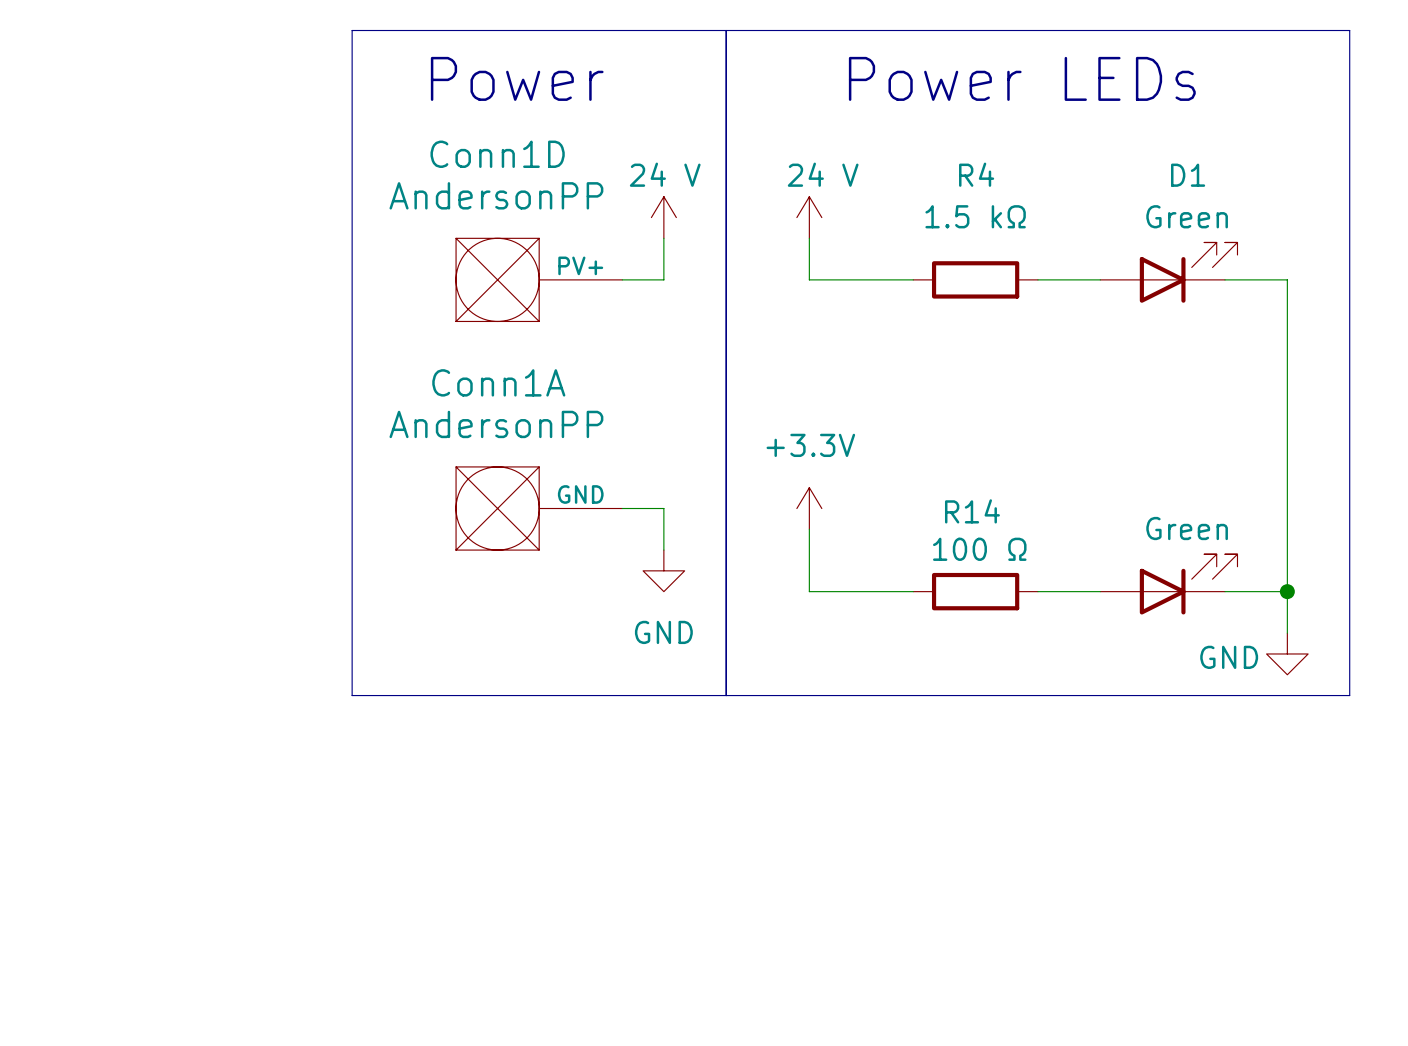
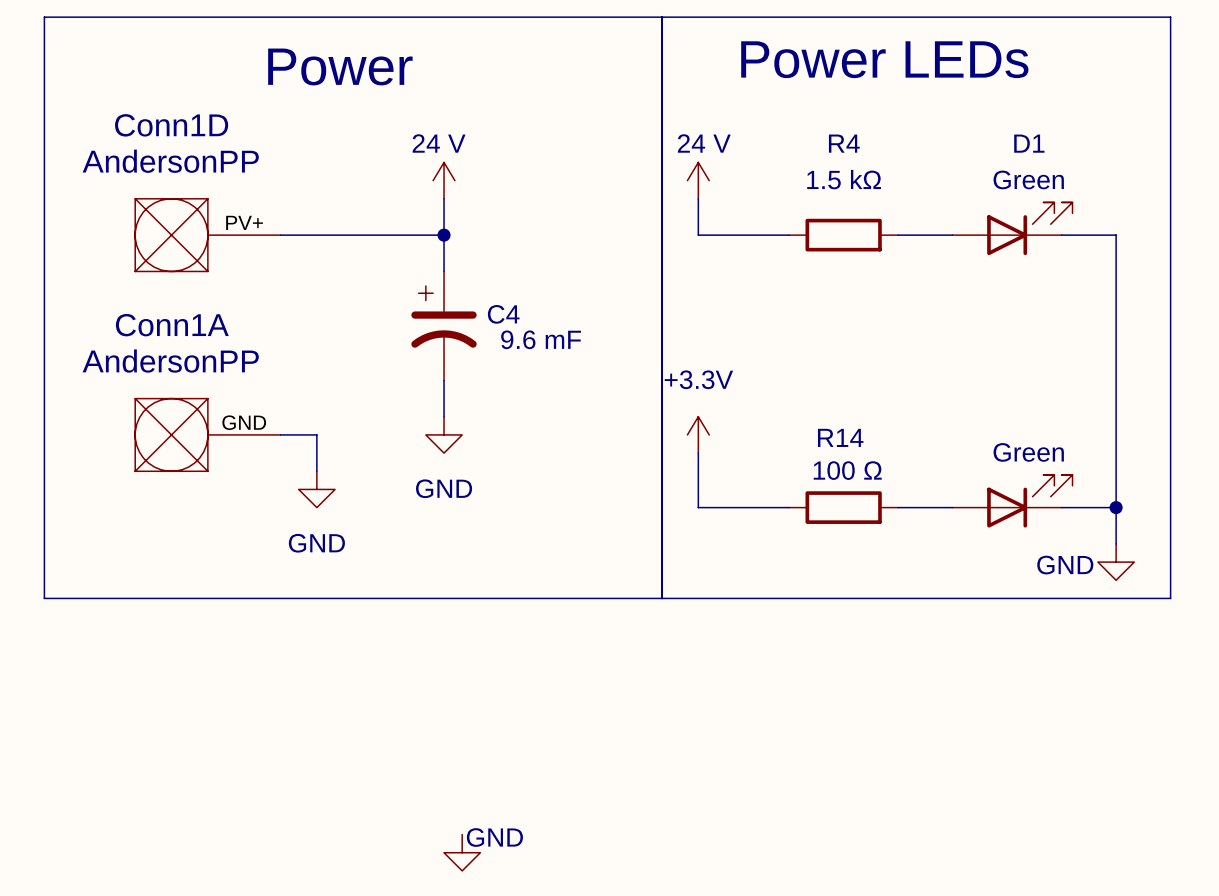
line: (352, 30) (352, 695) -> (298, 17) (44, 17) (44, 598) (298, 598)
line: (726, 30) (726, 695) -> (661, 17) (661, 598)
text position: Power (517, 78) -> Power (340, 66)
power symbol position: 24 V (663, 217) -> 24 V (444, 180)
wire: none -> (444, 198) (444, 271)
wire: (663, 238) (663, 279) (622, 279) -> none
wire: none -> (280, 235) (444, 235)
junction: none -> (444, 235)
Conn1D position: (539, 279) -> (207, 235)
C4: none -> 9.6 mF (444, 325)
wire: none -> (444, 380) (444, 416)
power symbol: none -> GND (444, 434)
Conn1A position: (539, 508) -> (207, 434)
wire: (622, 508) (663, 508) (663, 550) -> (280, 434) (316, 434) (316, 471)
power symbol: none -> GND (316, 489)
power symbol: GND (663, 570) -> none
power symbol: none -> GND (462, 852)

